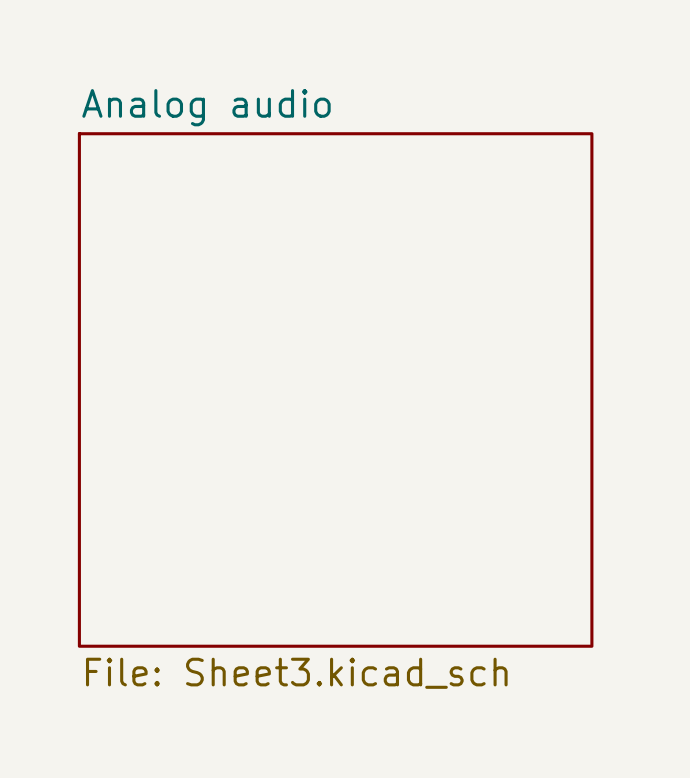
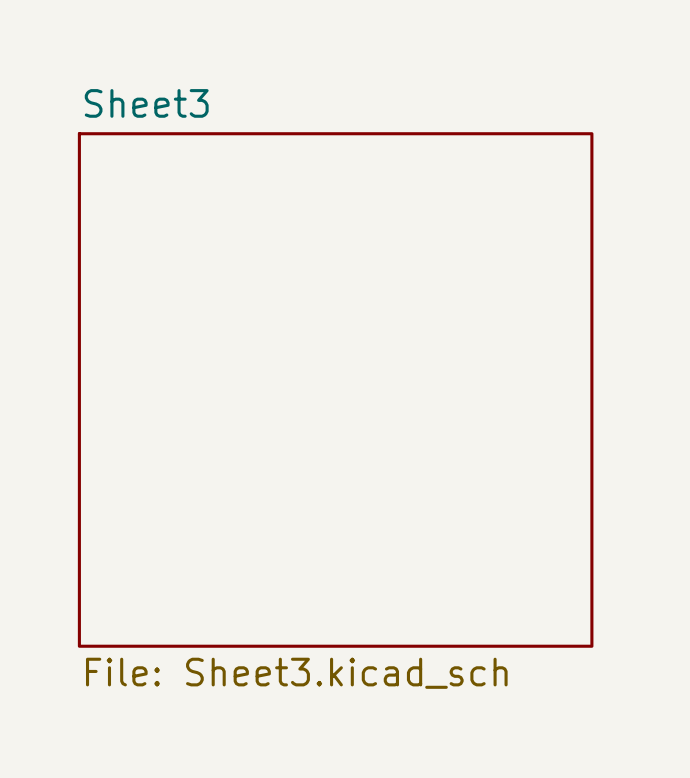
sheet Analog audio name: Analog audio (206, 107) -> Sheet3 (146, 103)

